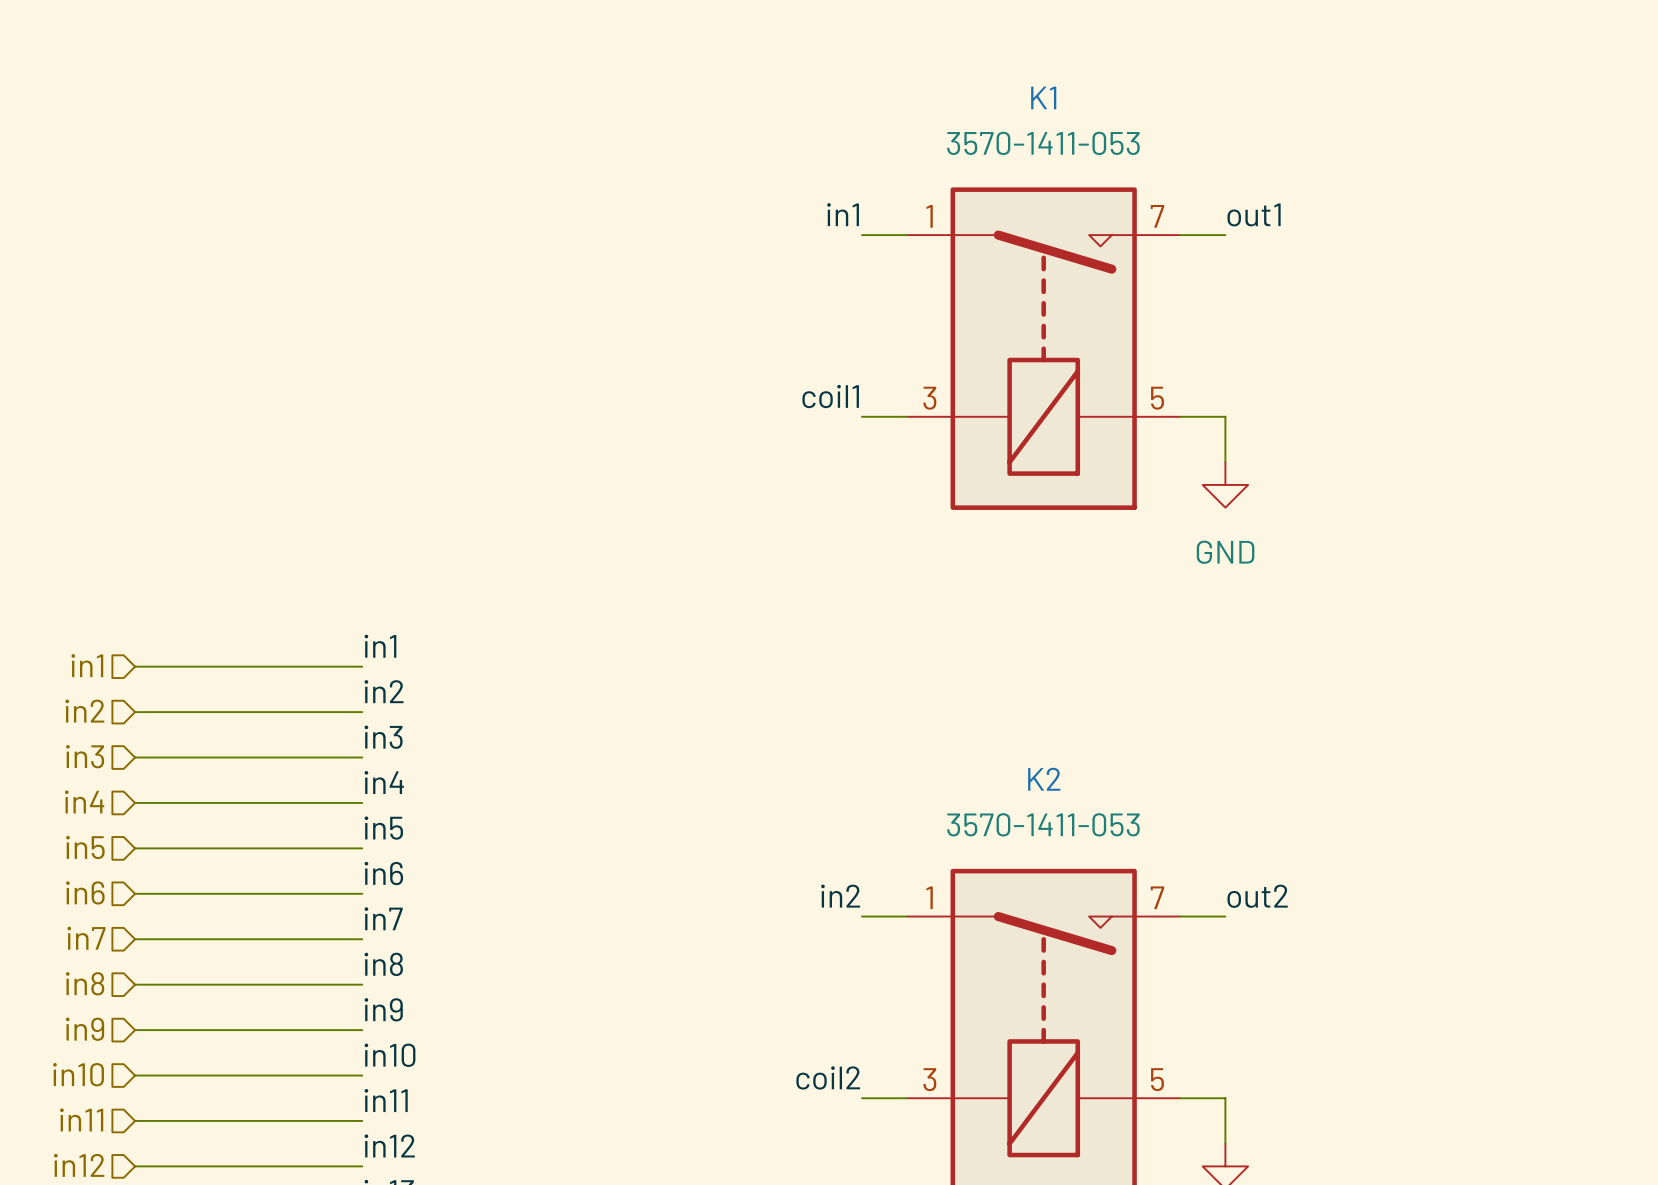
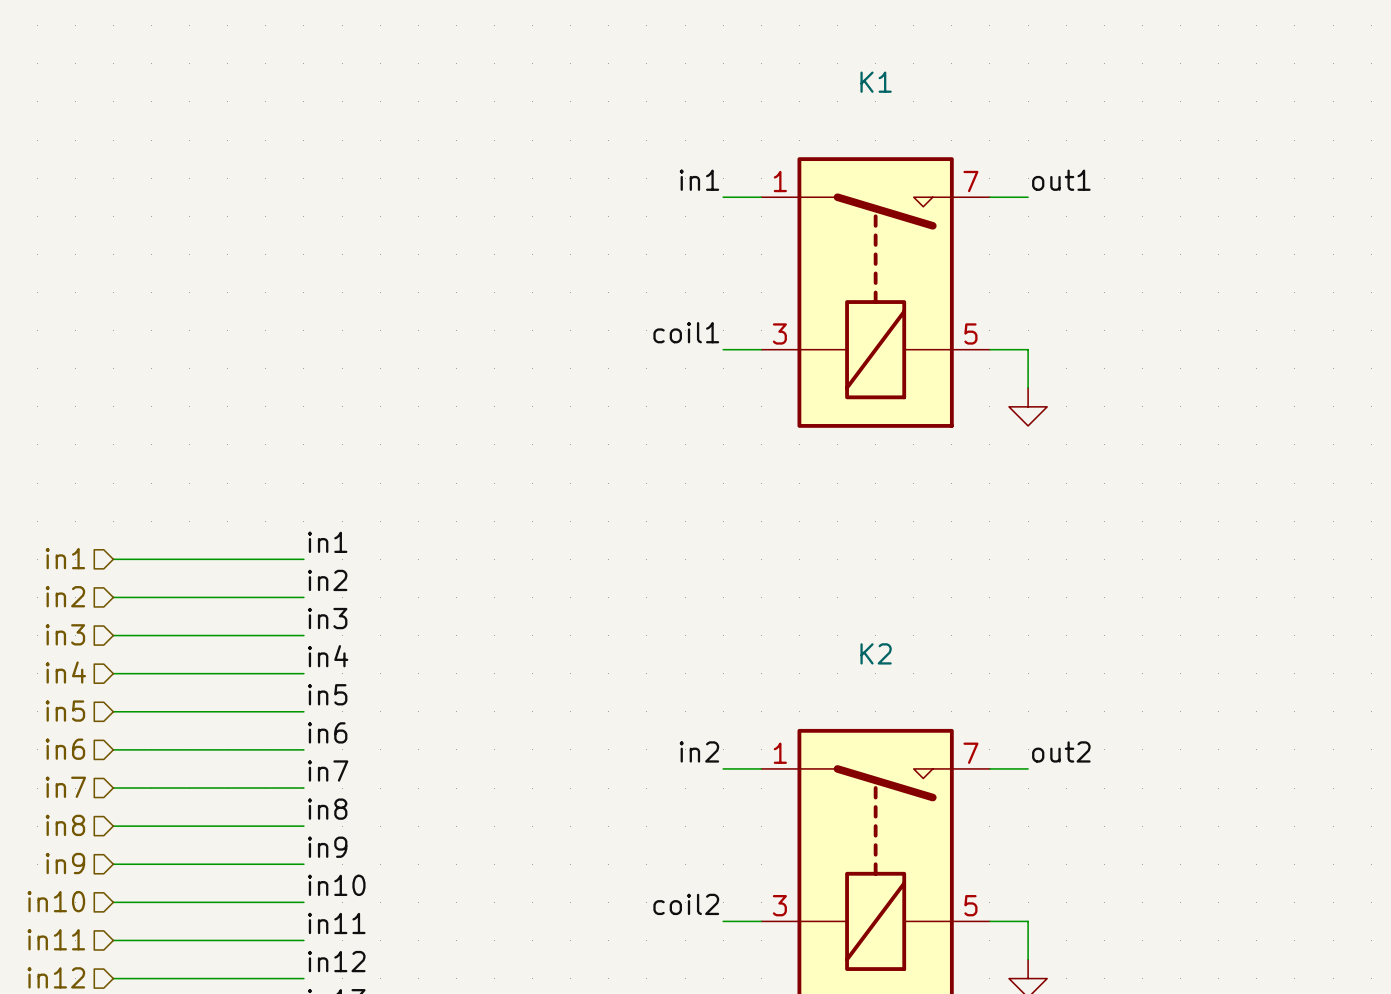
K1 value: 3570-1411-053 (1043, 143) -> none
power symbol text: GND (1225, 552) -> none
K2 value: 3570-1411-053 (1043, 824) -> none

